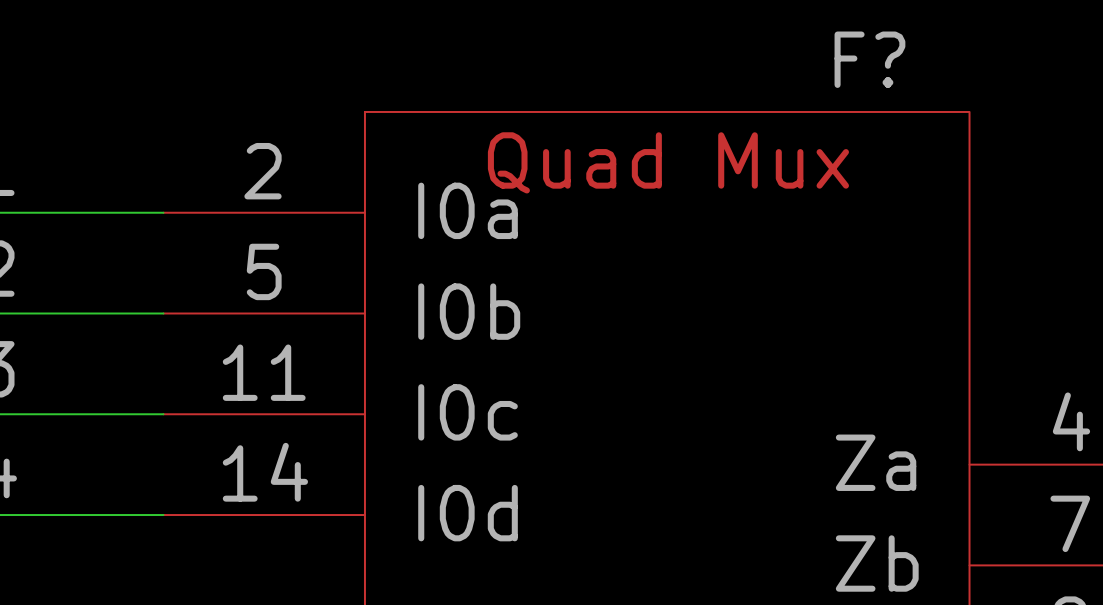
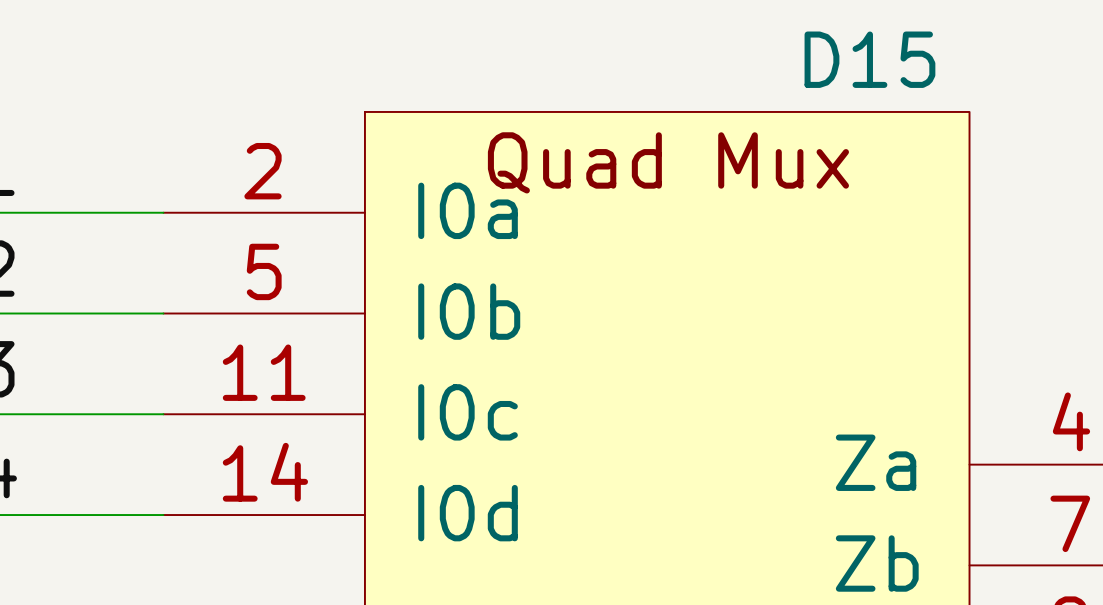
F? name: F? (869, 59) -> D15 (869, 59)

